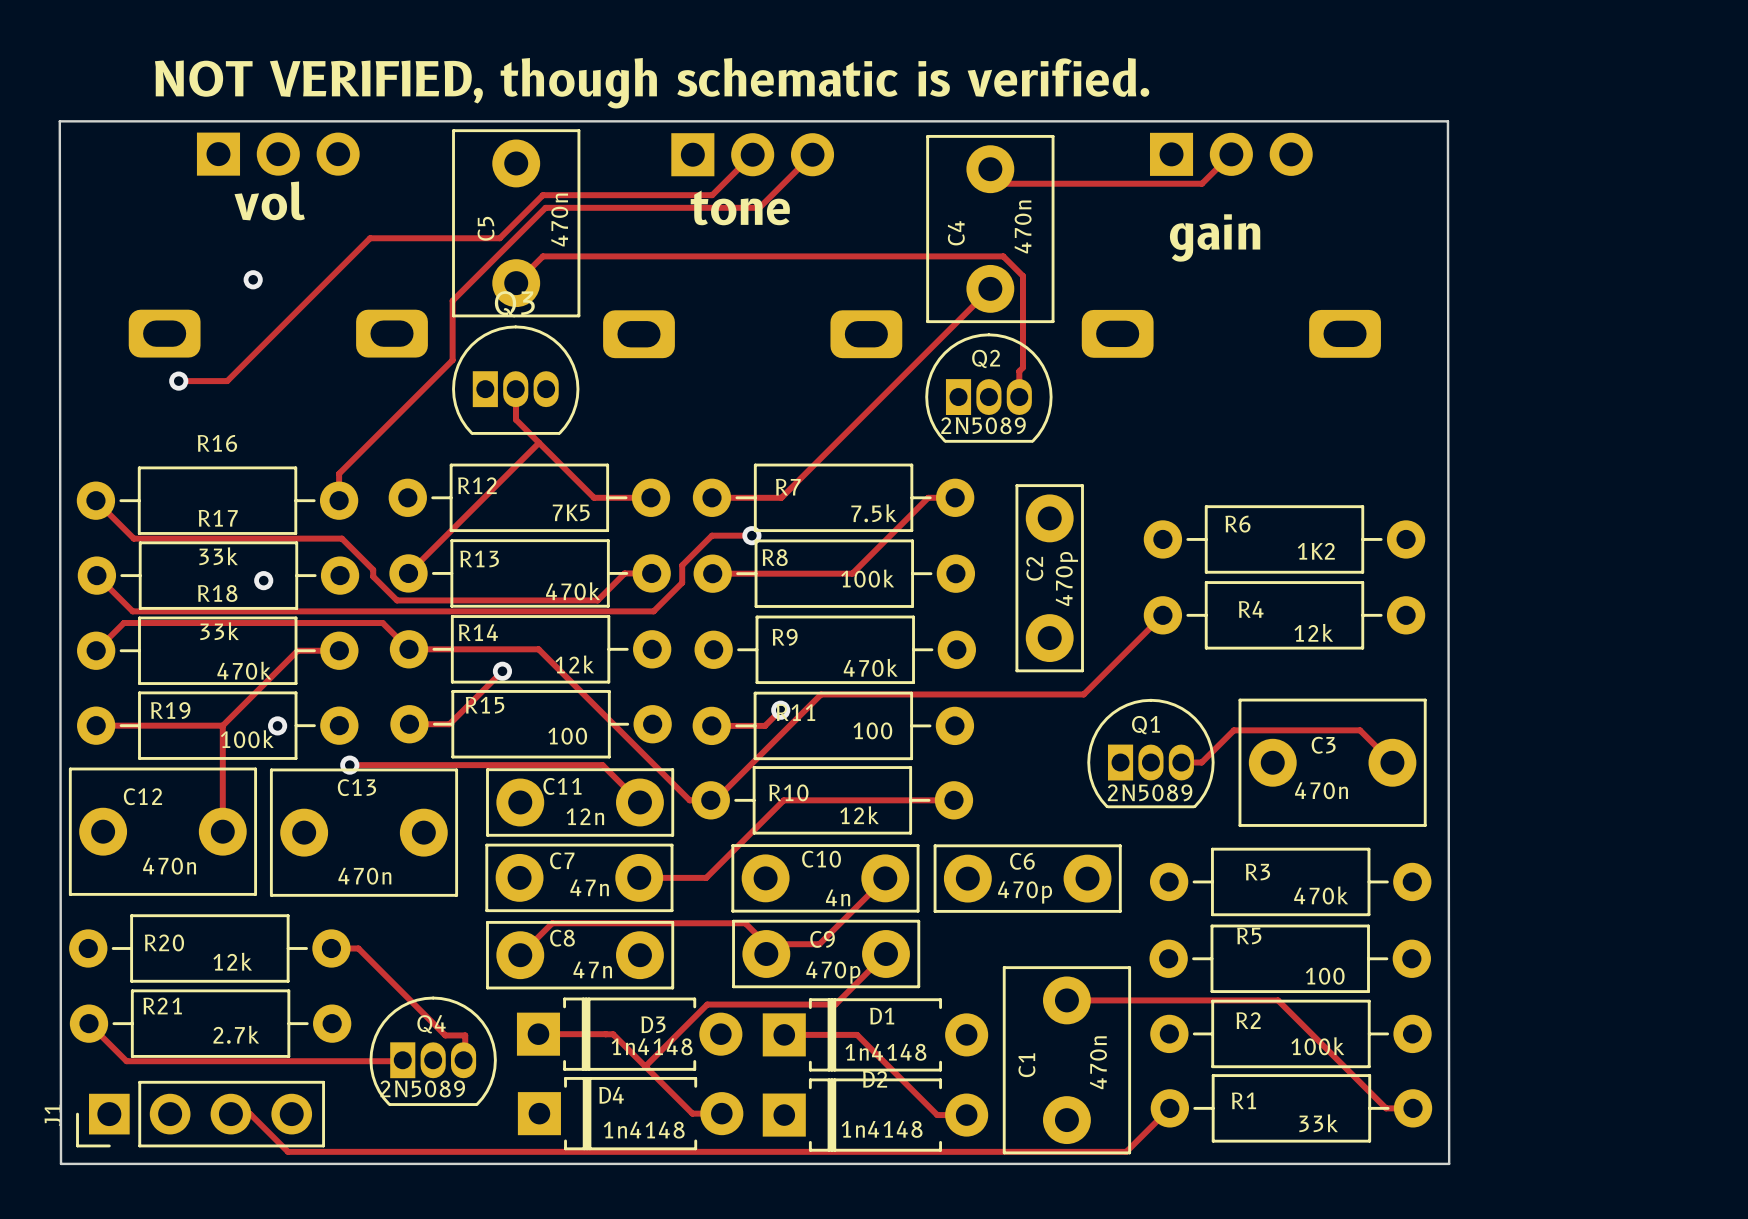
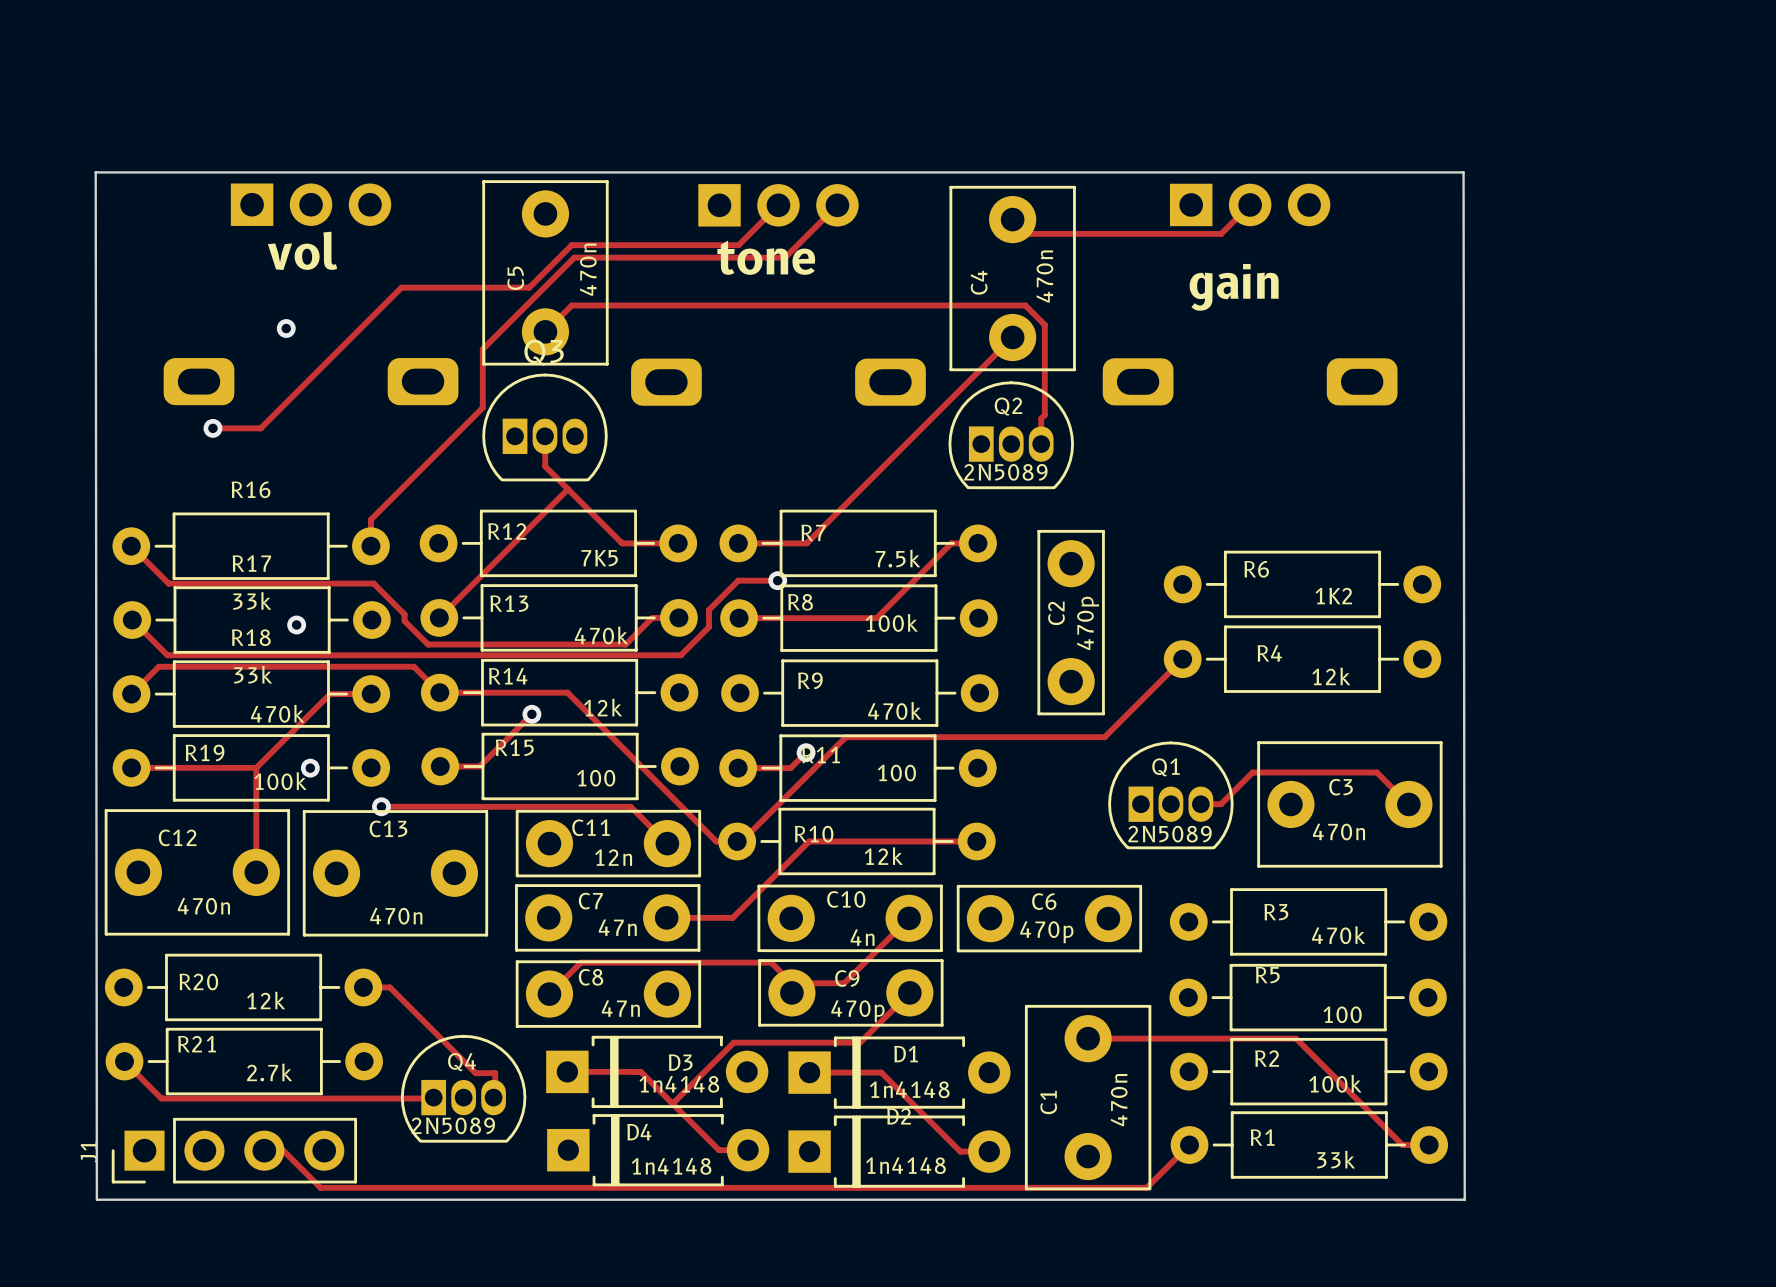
text: NOT VERIFIED, though schematic is verified. (652, 83) -> none

